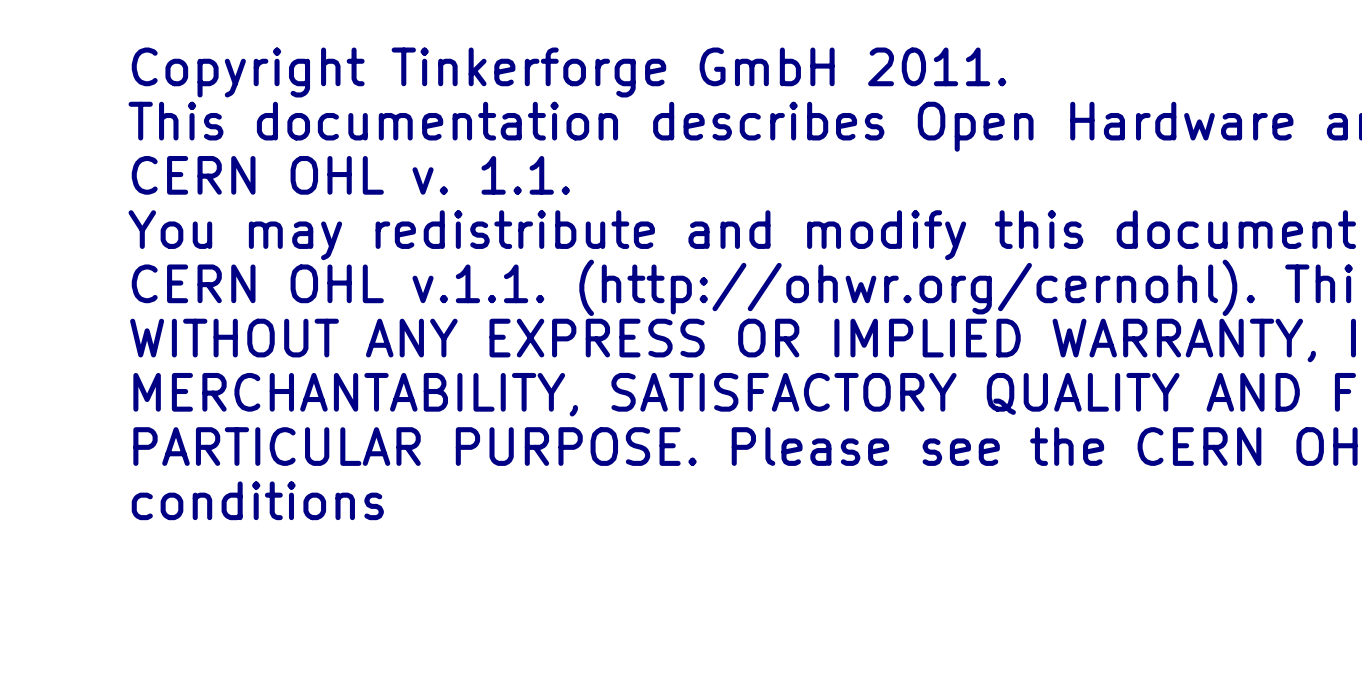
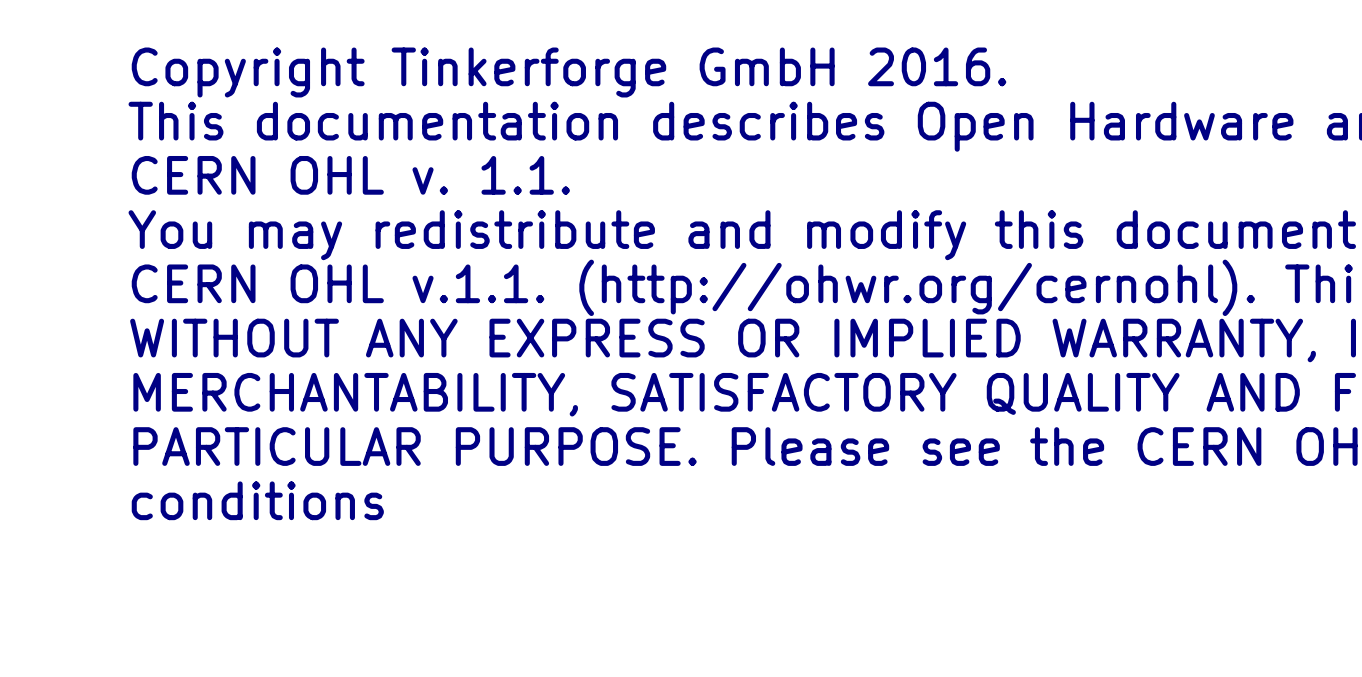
text: Copyright Tinkerforge GmbH 2011. (569, 72) -> Copyright Tinkerforge GmbH 2016. (569, 72)

